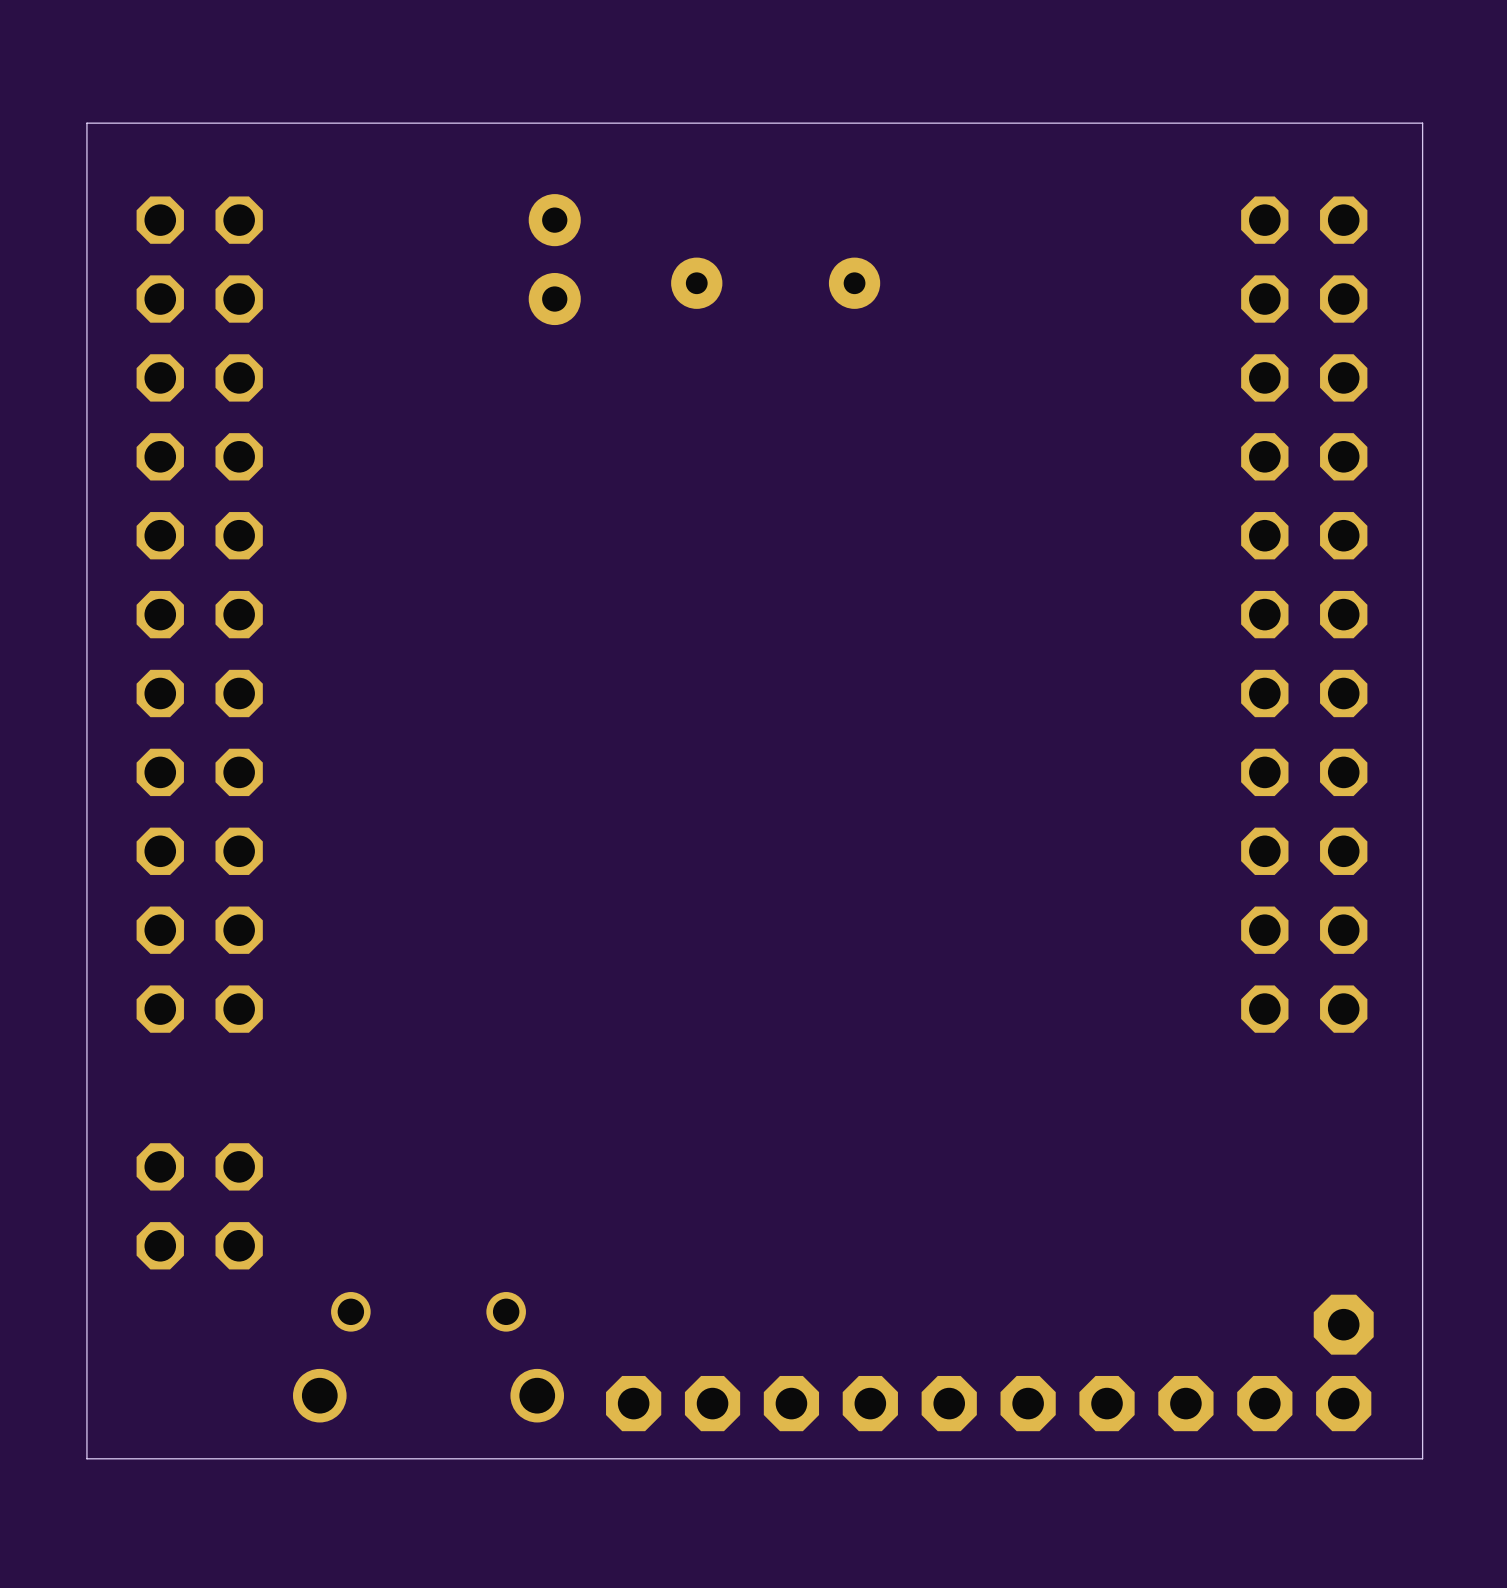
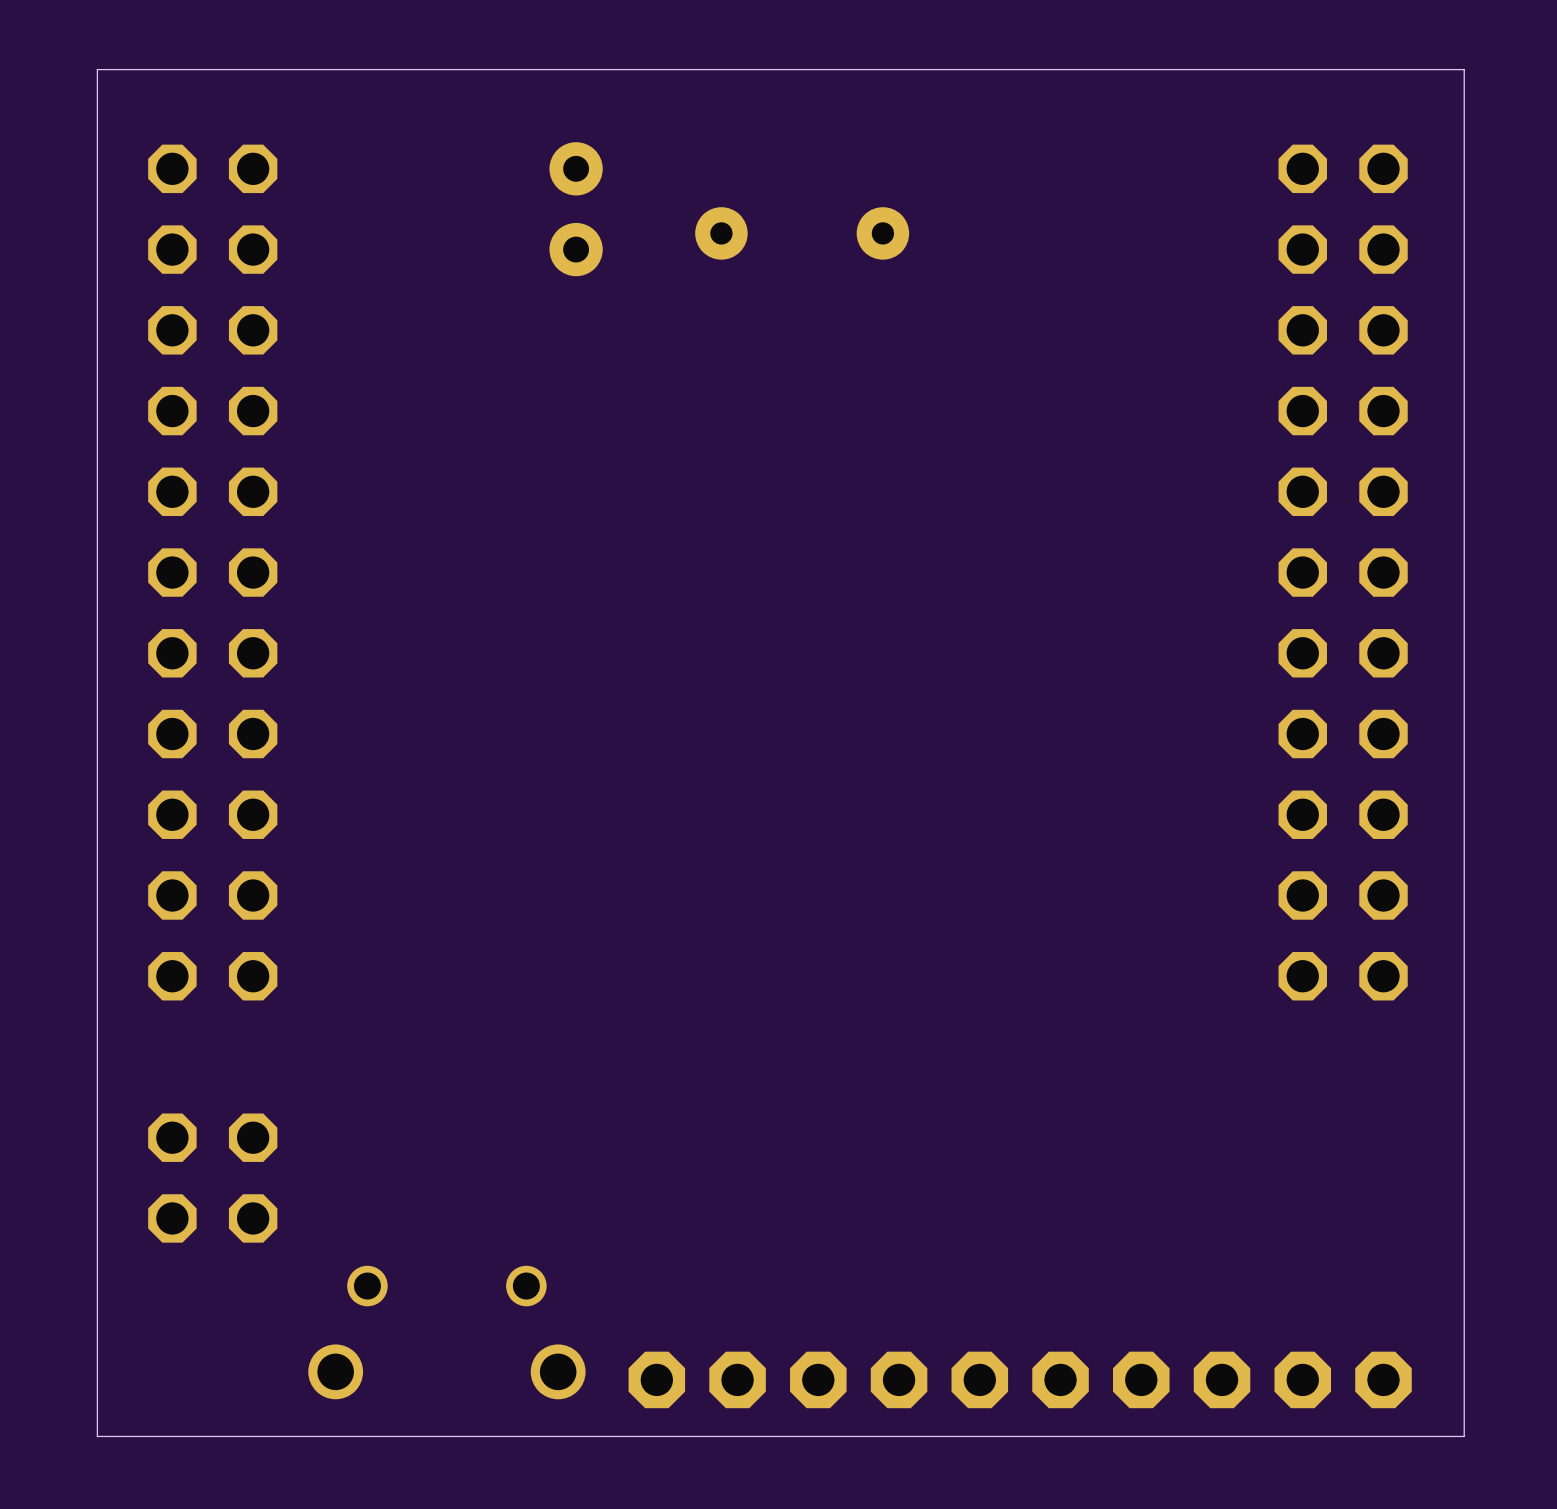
part: (1343, 1324) -> none

